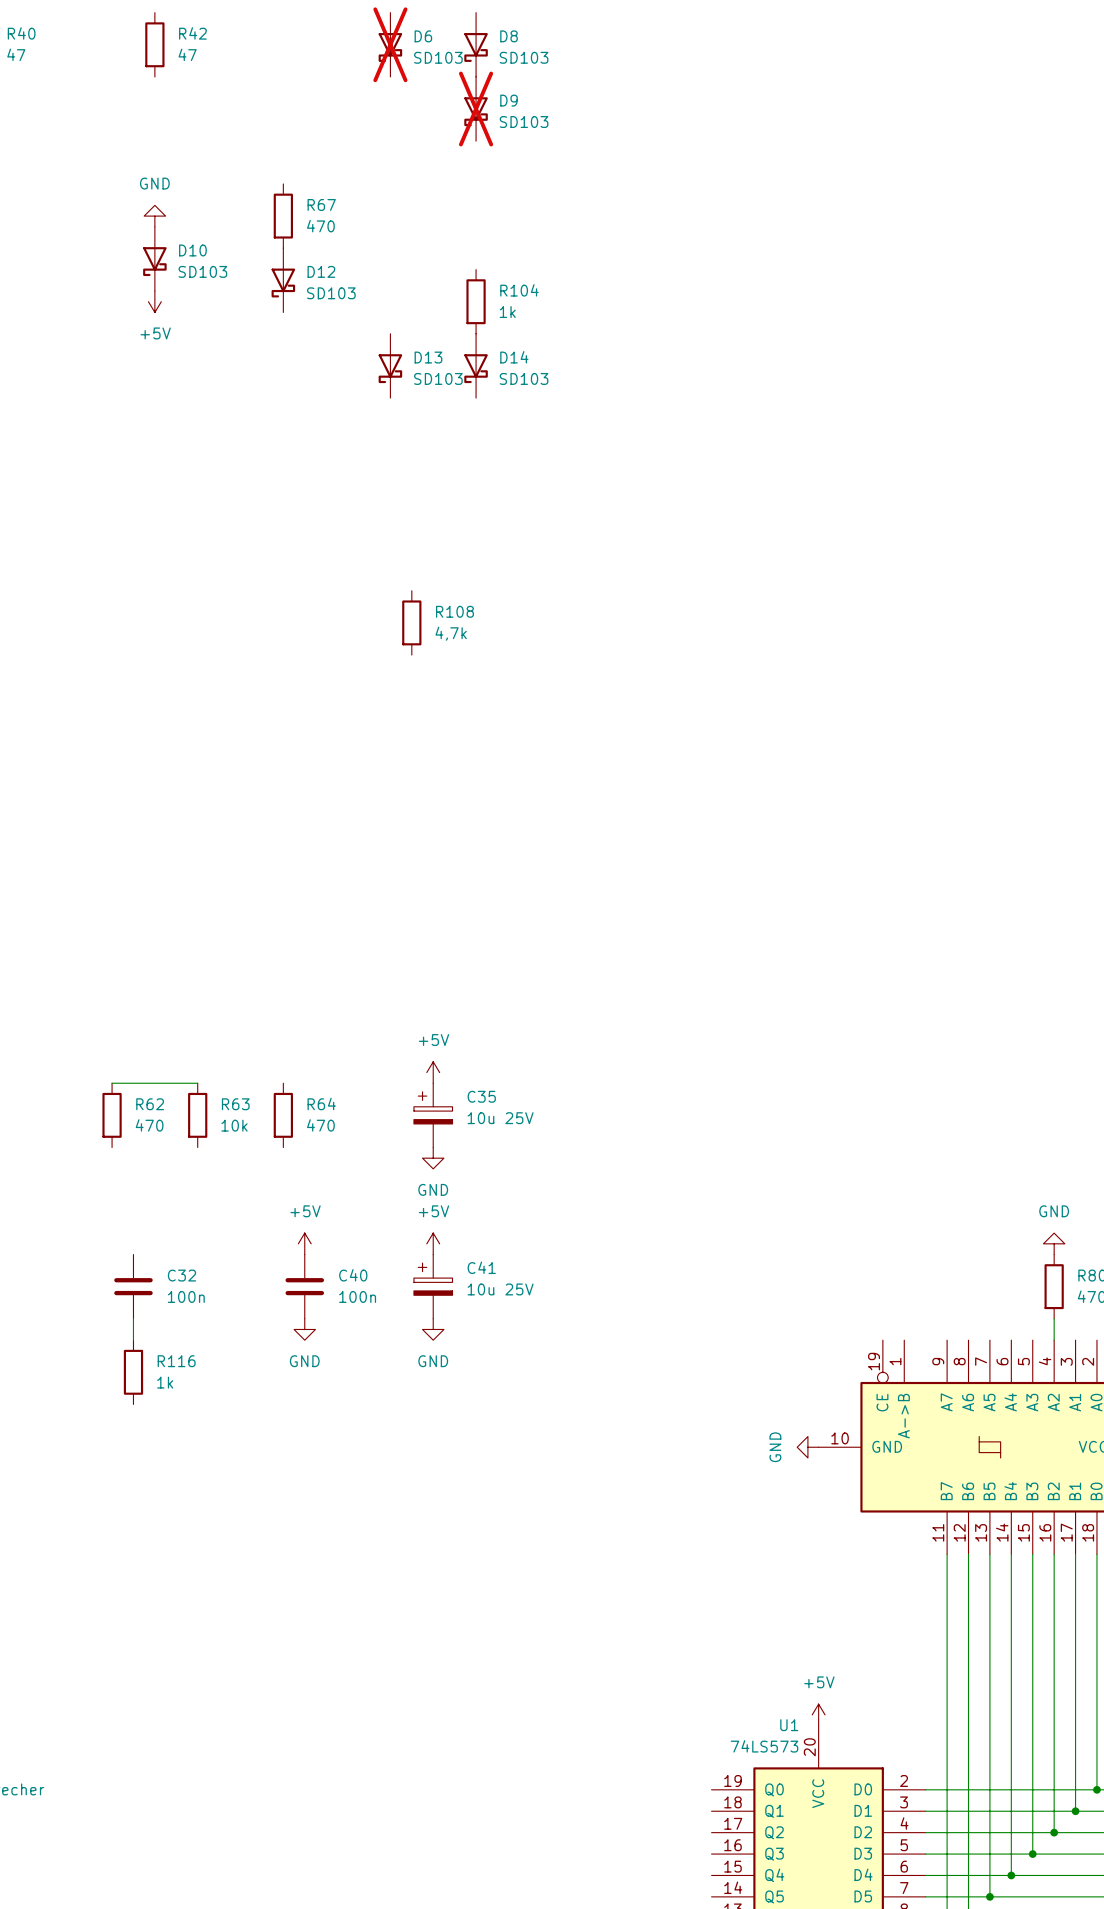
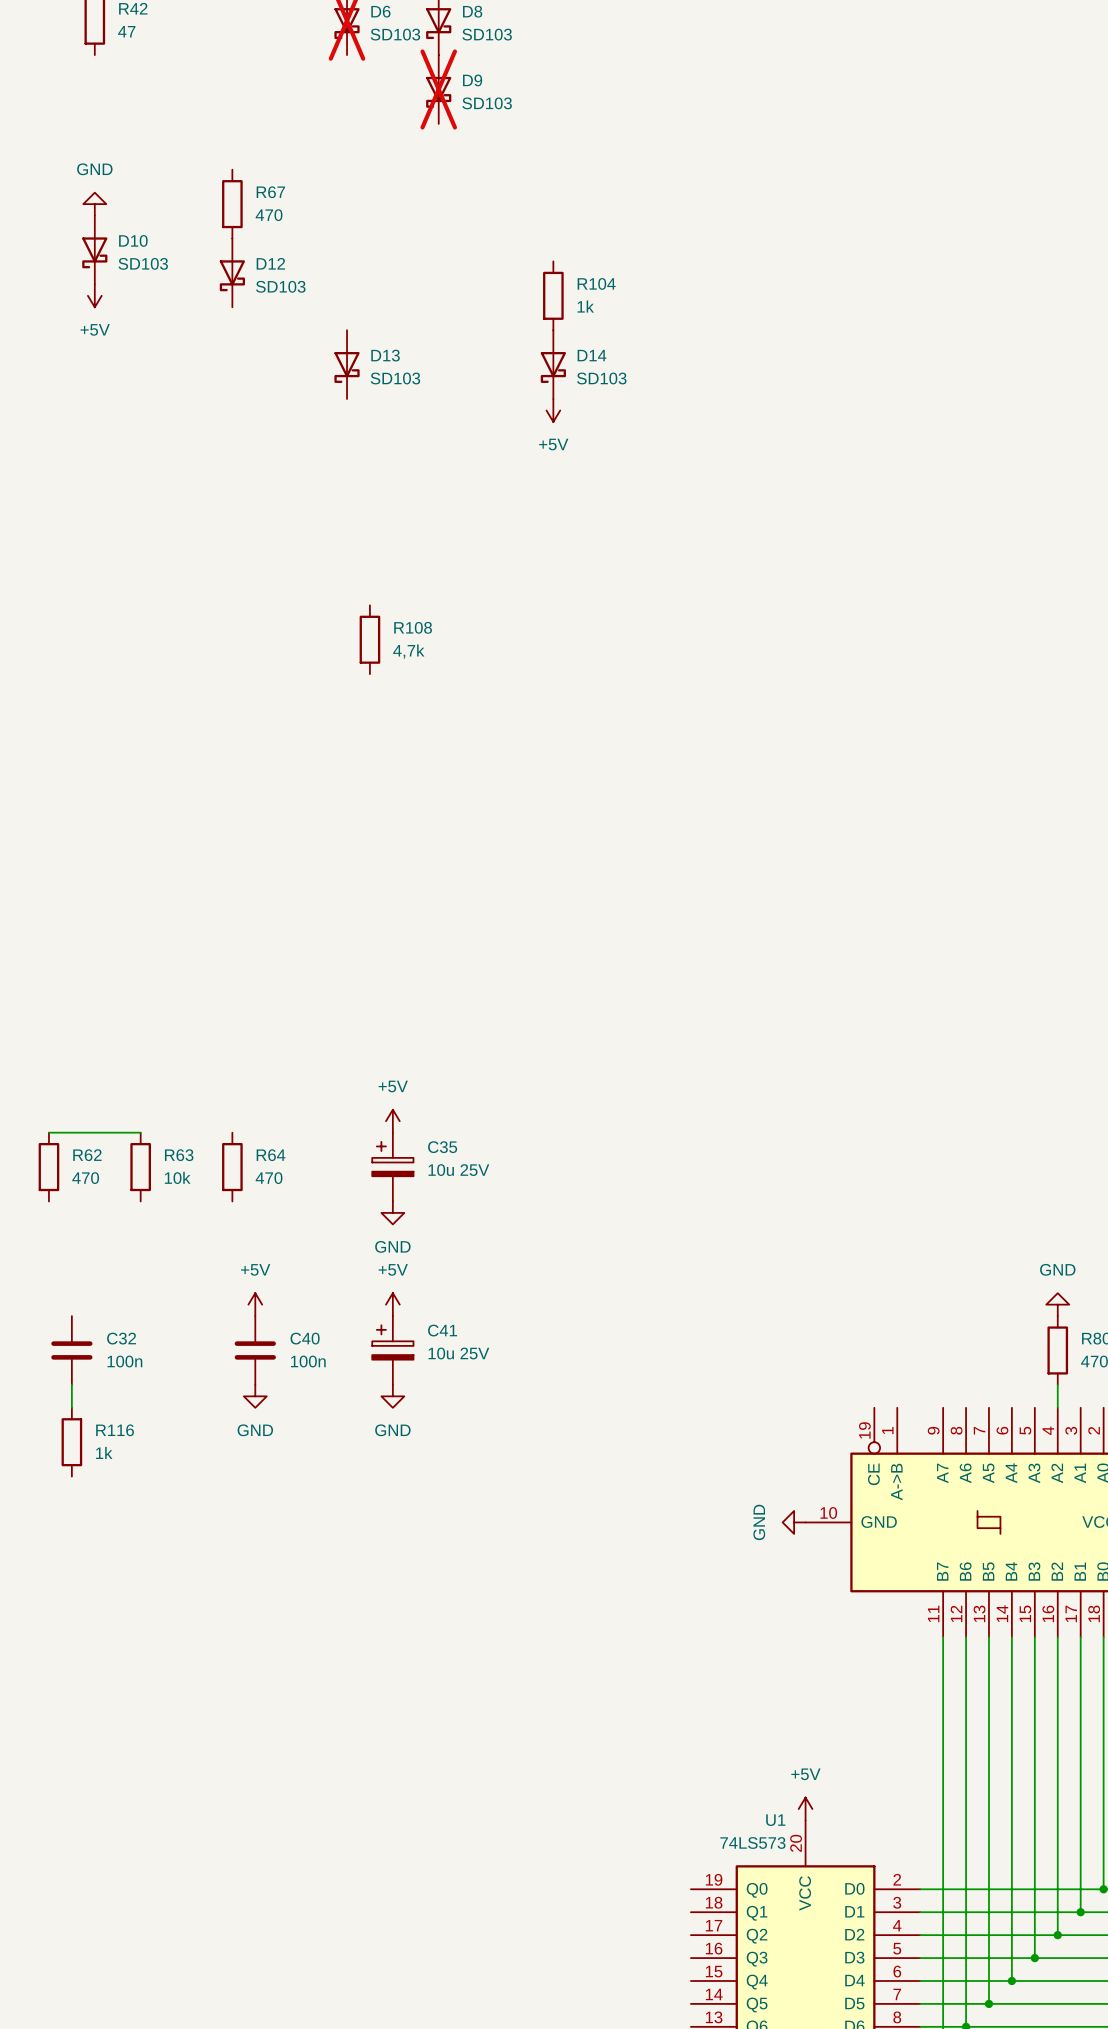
R104 position: (476, 301) -> (553, 295)
D14 position: (476, 365) -> (553, 364)
power symbol: none -> +5V (553, 410)

